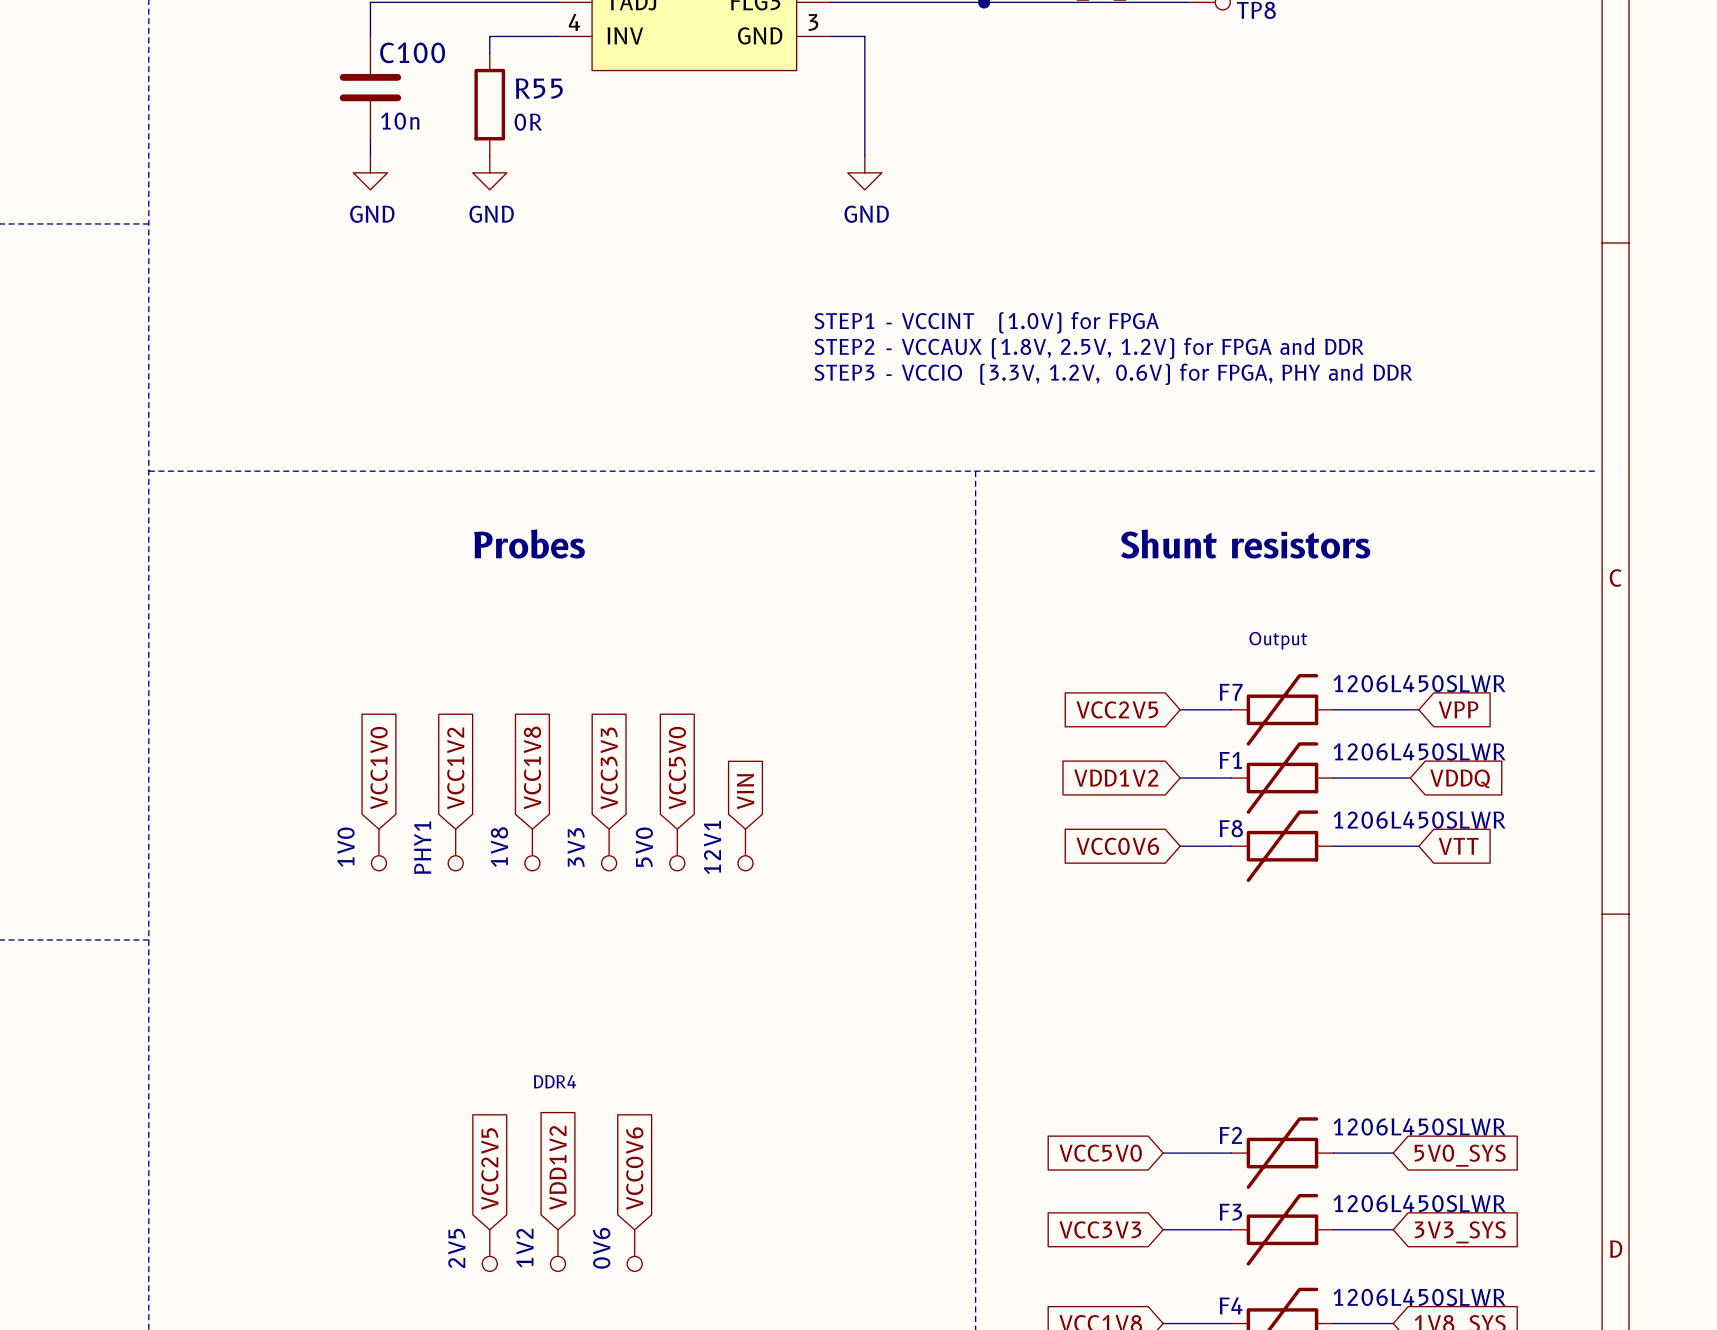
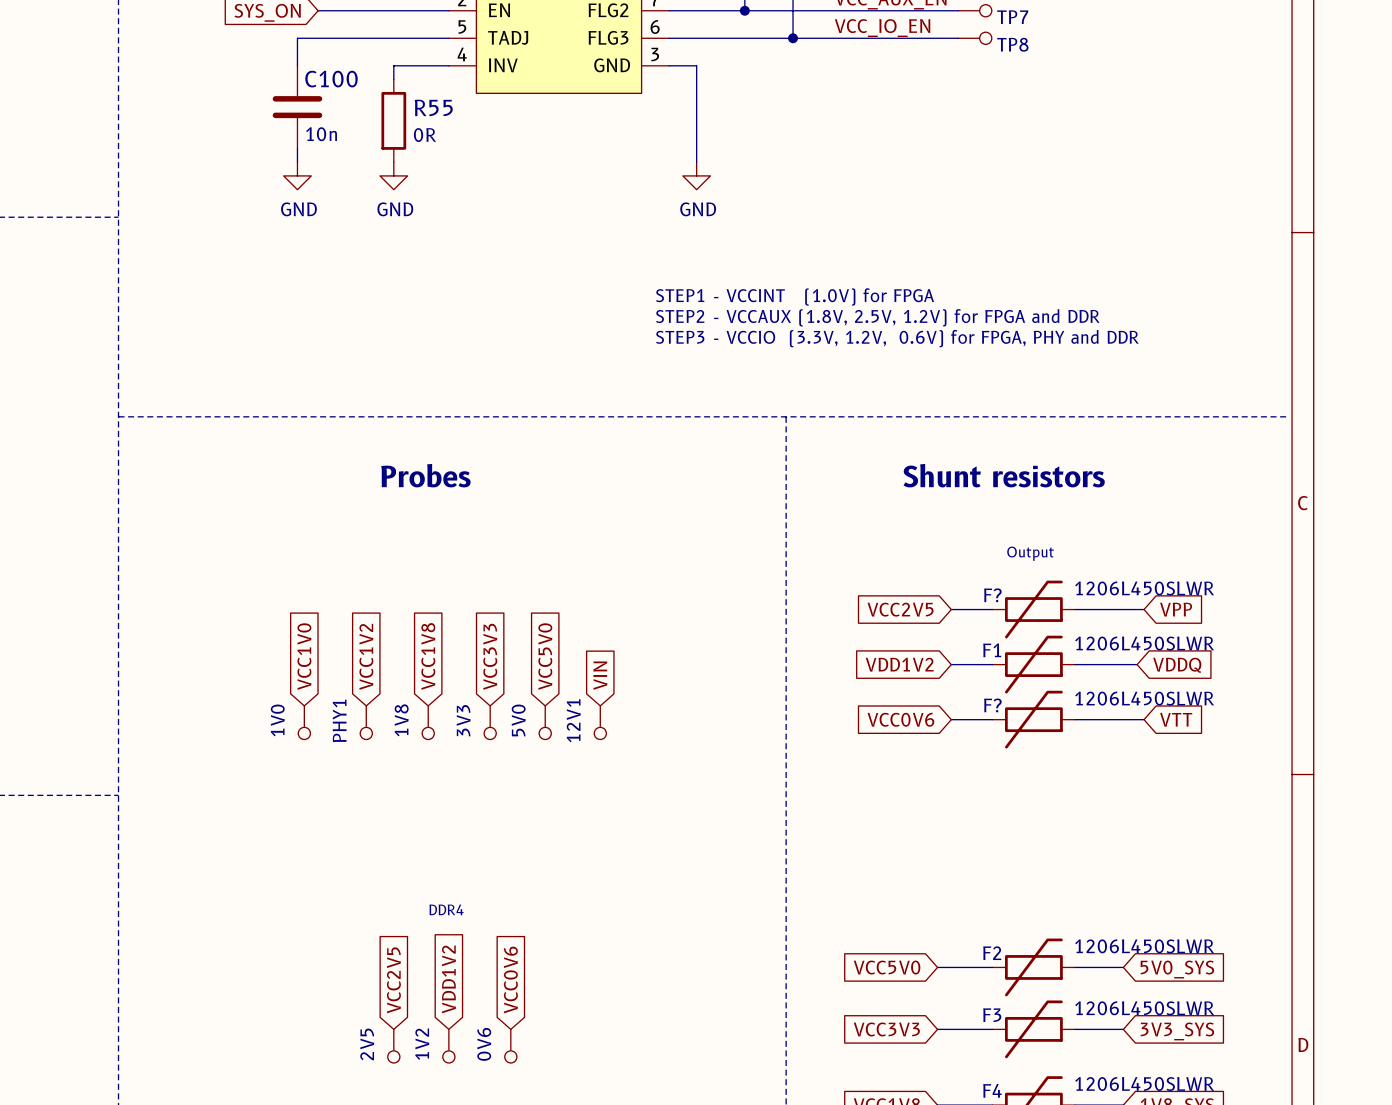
F7 name: F7 (1231, 692) -> F? (992, 595)
F8 name: F8 (1231, 828) -> F? (992, 705)

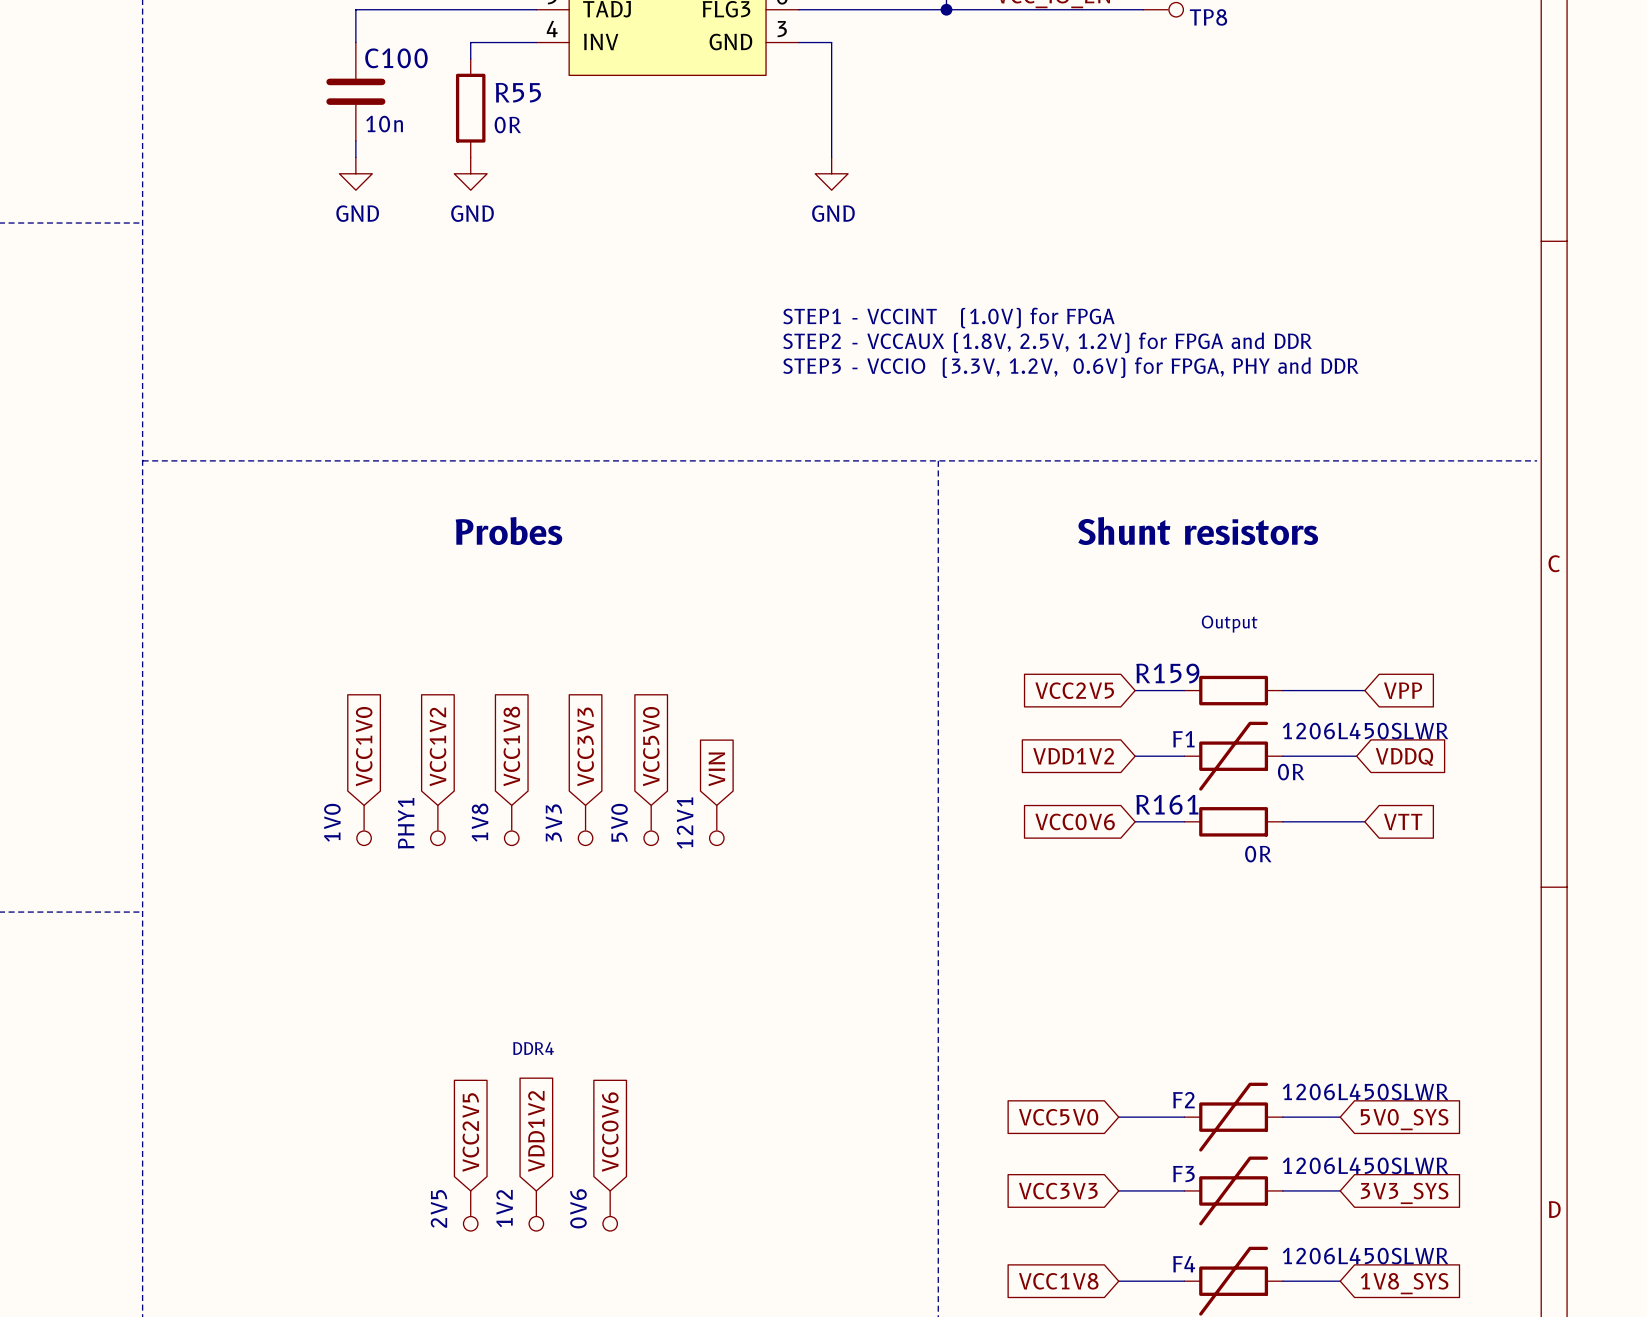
F?: 1206L450SLWR (1033, 609) -> none
R159: none -> (1233, 690)
F?: 1206L450SLWR (1033, 719) -> none
R161: none -> (1233, 821)

